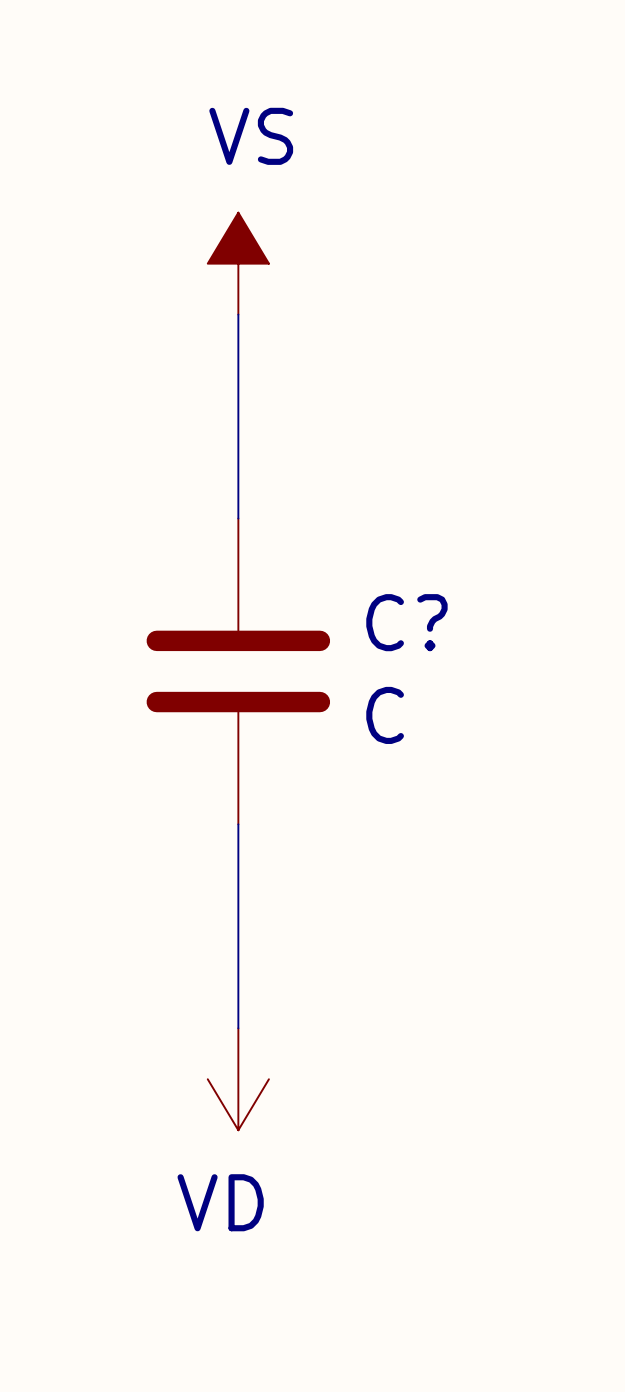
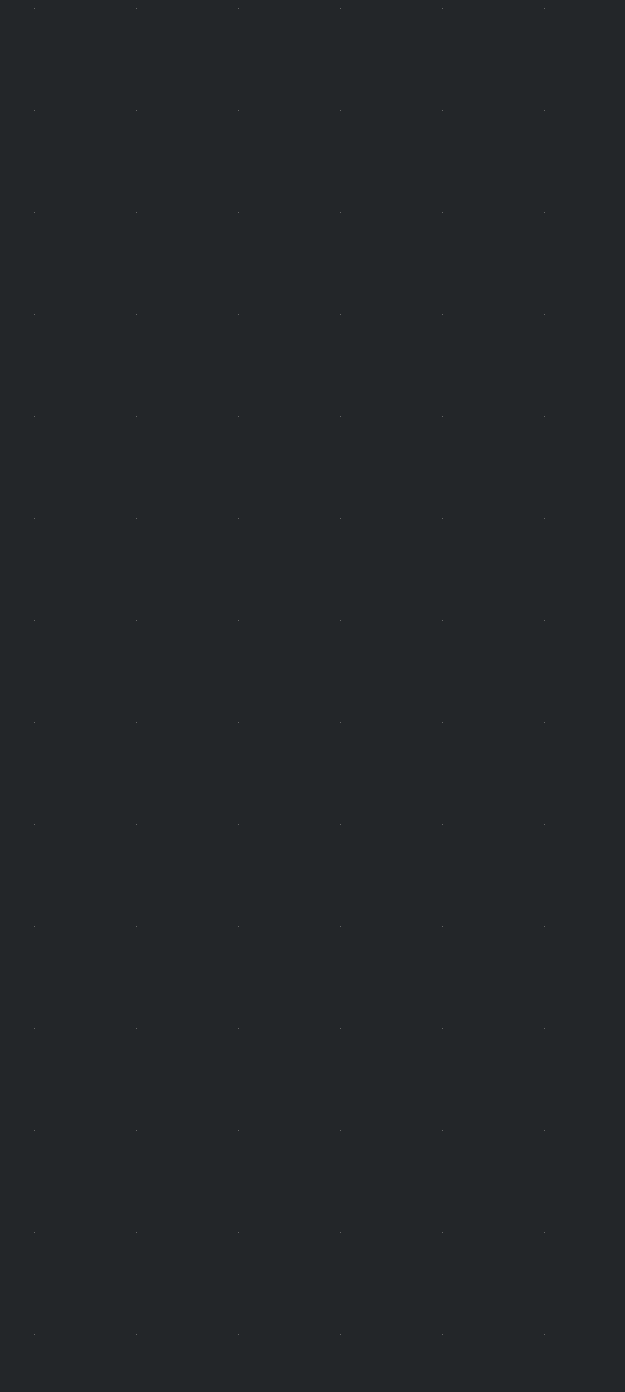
power symbol: VS (238, 263) -> none
wire: (238, 314) (238, 518) -> none
C?: C (238, 671) -> none
wire: (238, 824) (238, 1028) -> none
power symbol: VD (238, 1079) -> none

